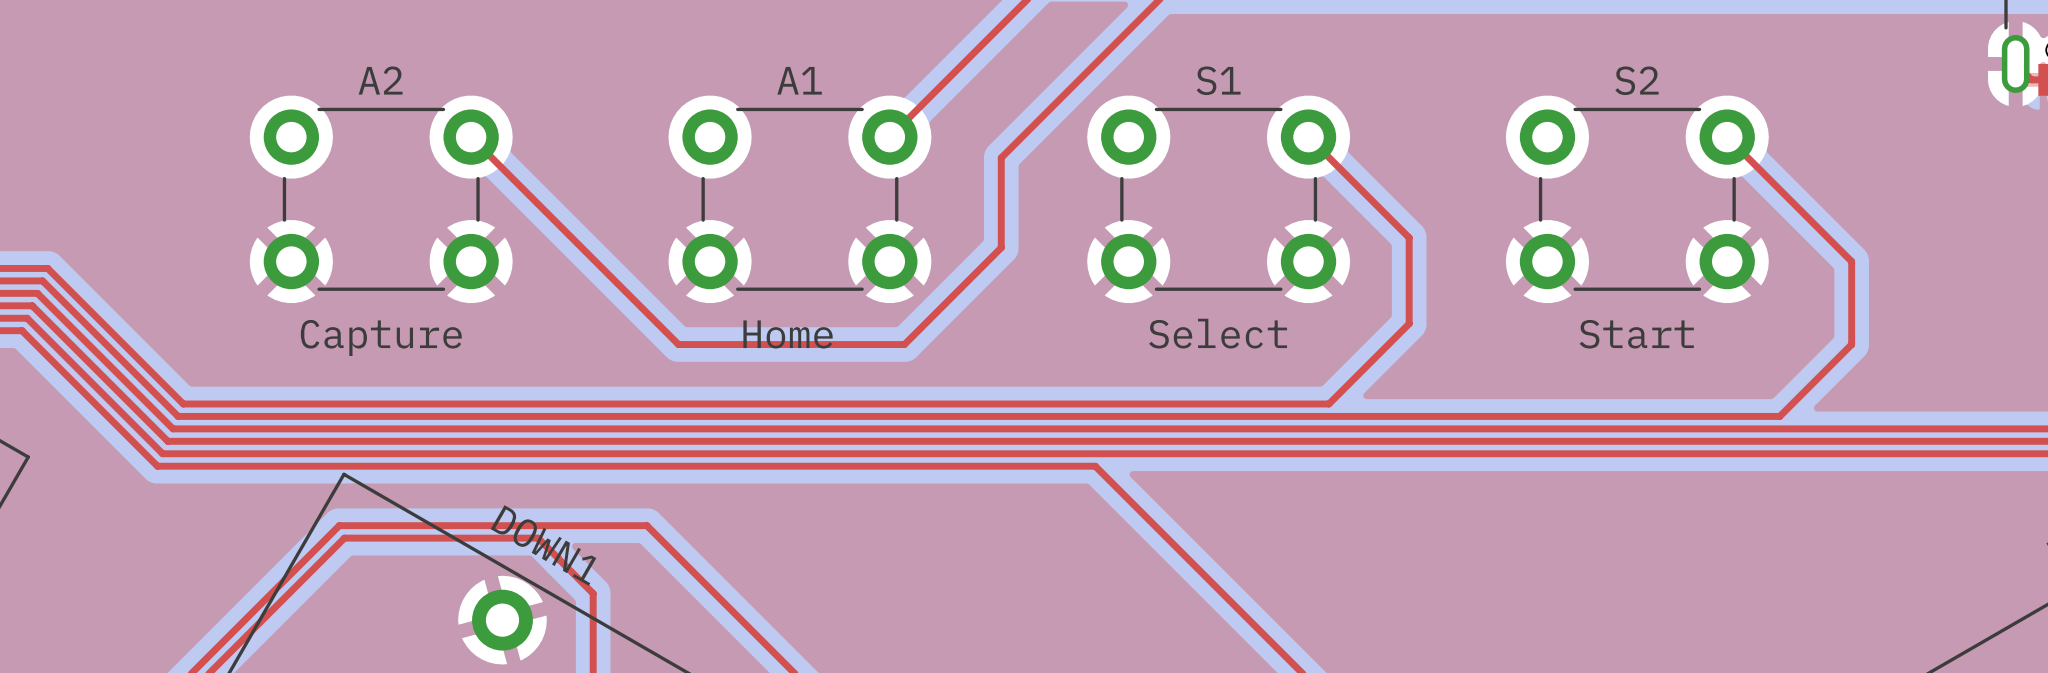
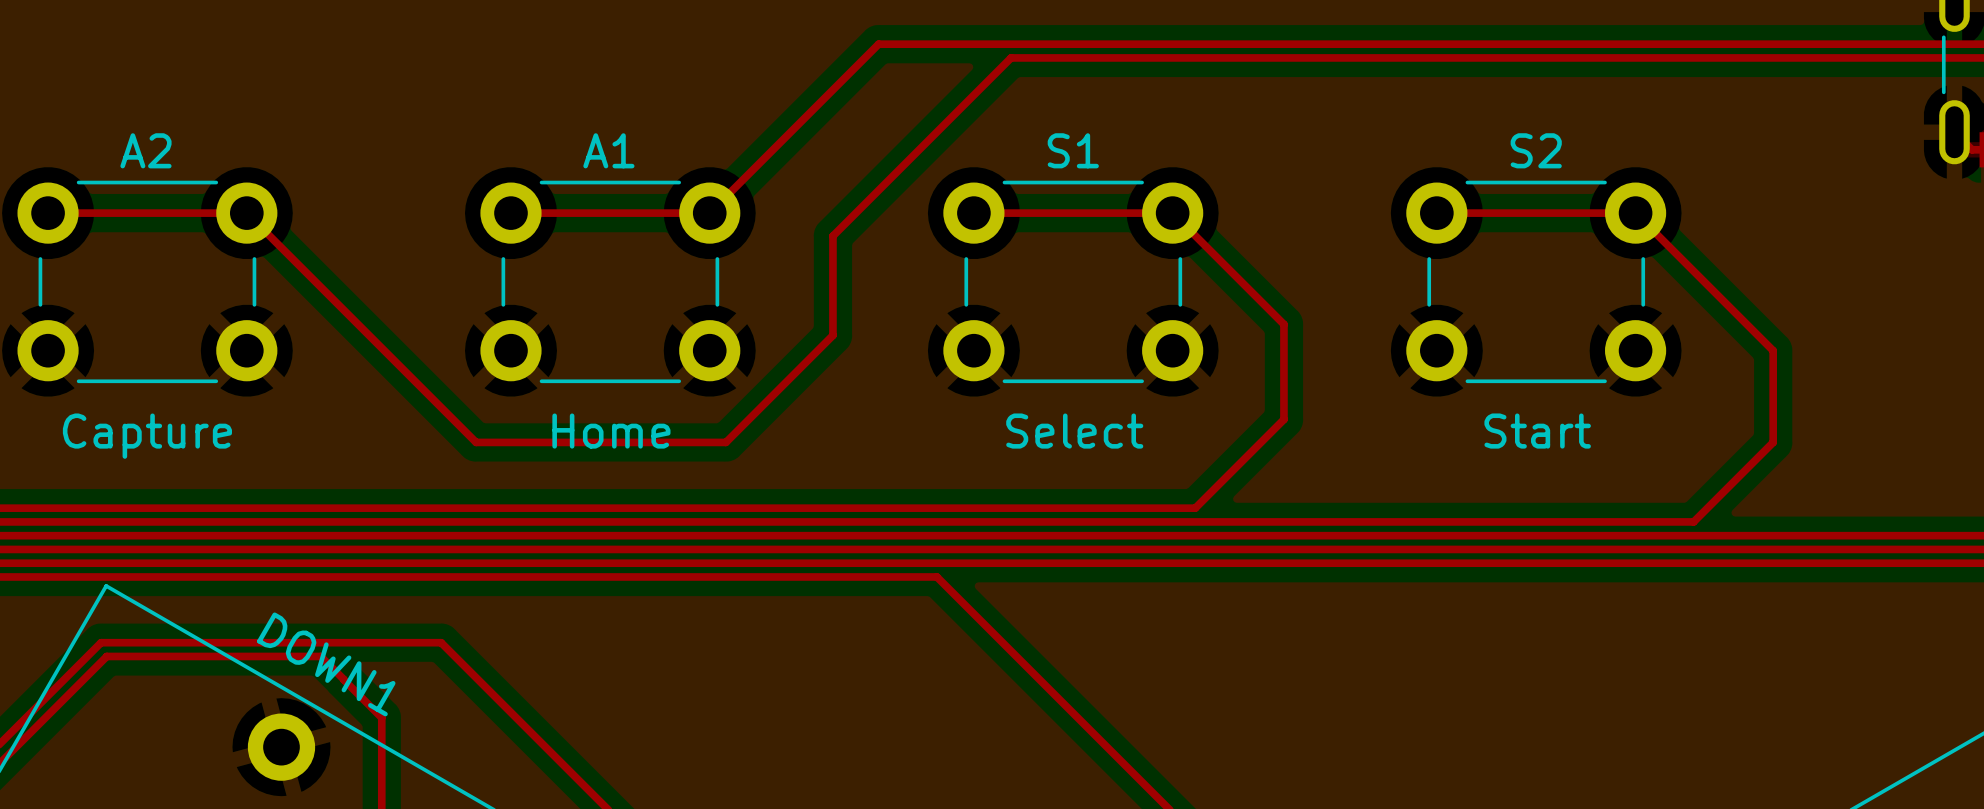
top track: none -> (48, 213) (246, 213)
top track: none -> (510, 213) (709, 213)
top track: none -> (973, 213) (1172, 213)
top track: none -> (1436, 213) (1635, 213)

